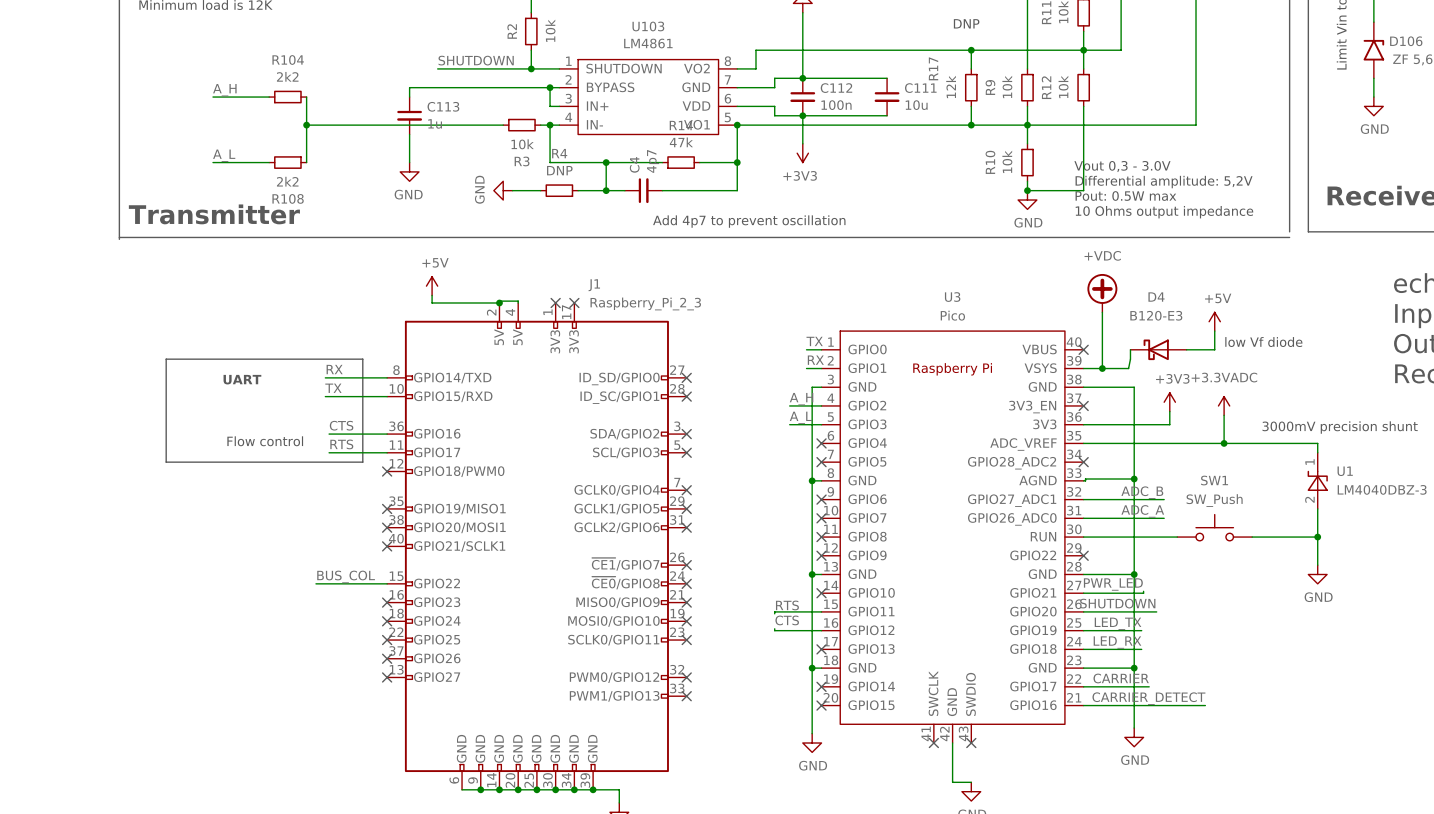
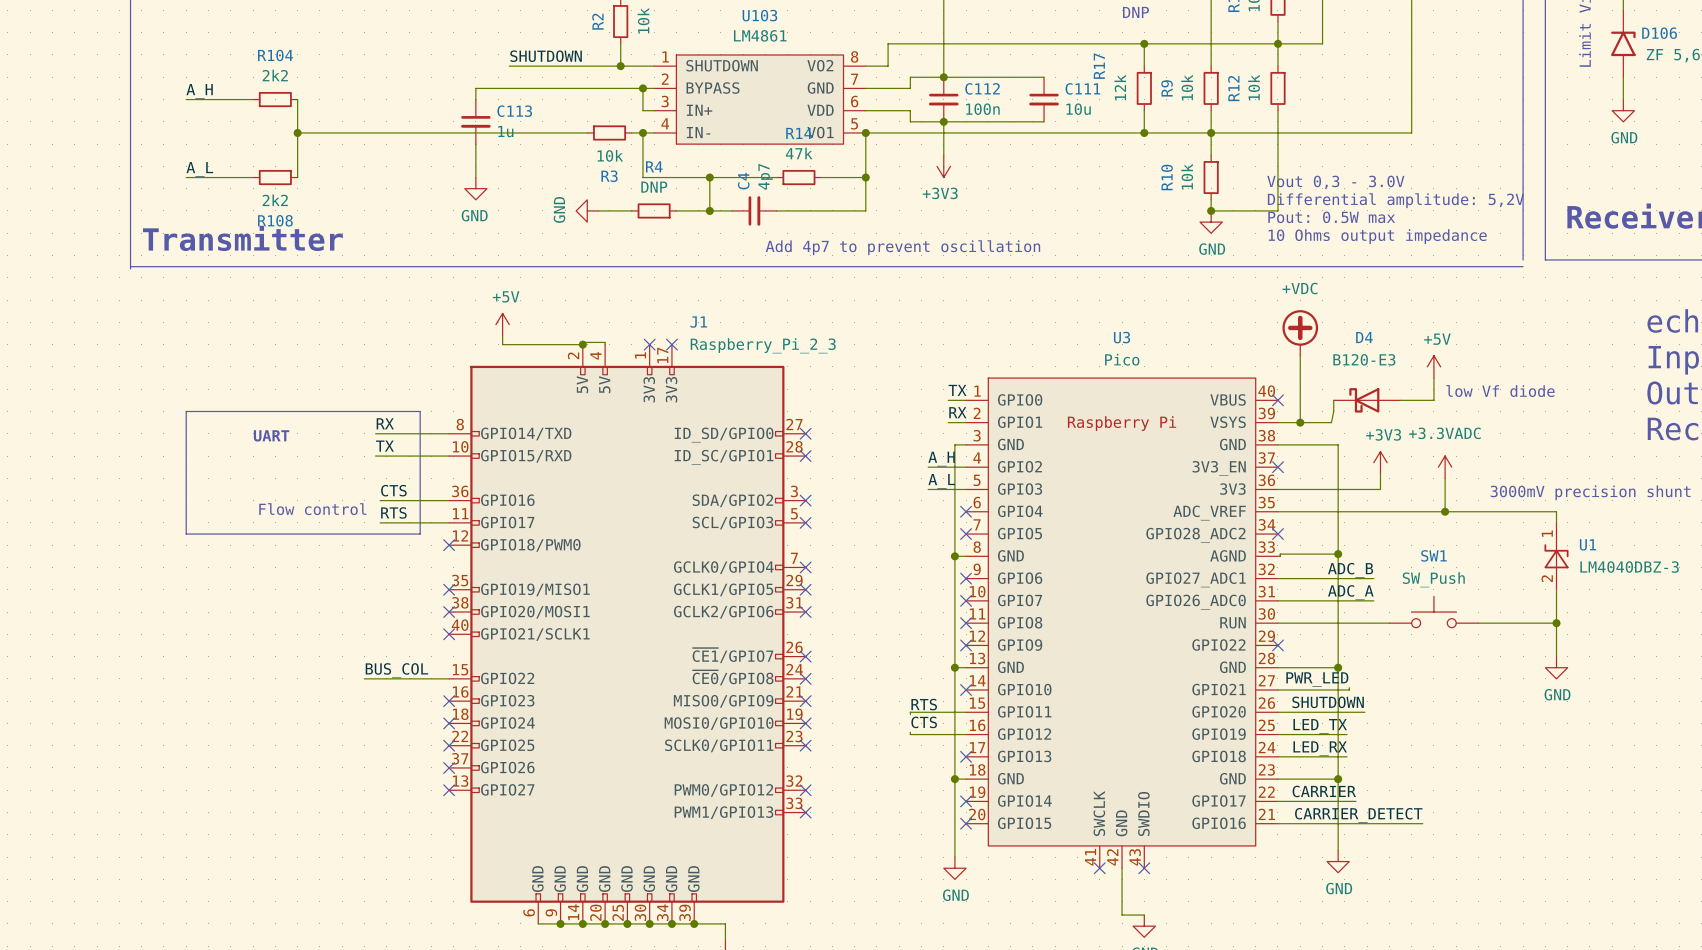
label position: A_H (224, 90) -> A_H (199, 91)
wire: none -> (186, 99) (241, 99)
wire: (222, 97) (269, 97) -> (297, 132) (353, 132)
R104 position: (287, 97) -> (275, 99)
wire: (306, 97) (306, 162) -> (297, 99) (297, 177)
junction: none -> (297, 132)
junction: (306, 125) -> none
label position: A_L (224, 155) -> A_L (199, 169)
wire: (222, 162) (269, 162) -> (186, 177) (241, 177)
R108 position: (287, 162) -> (275, 177)

